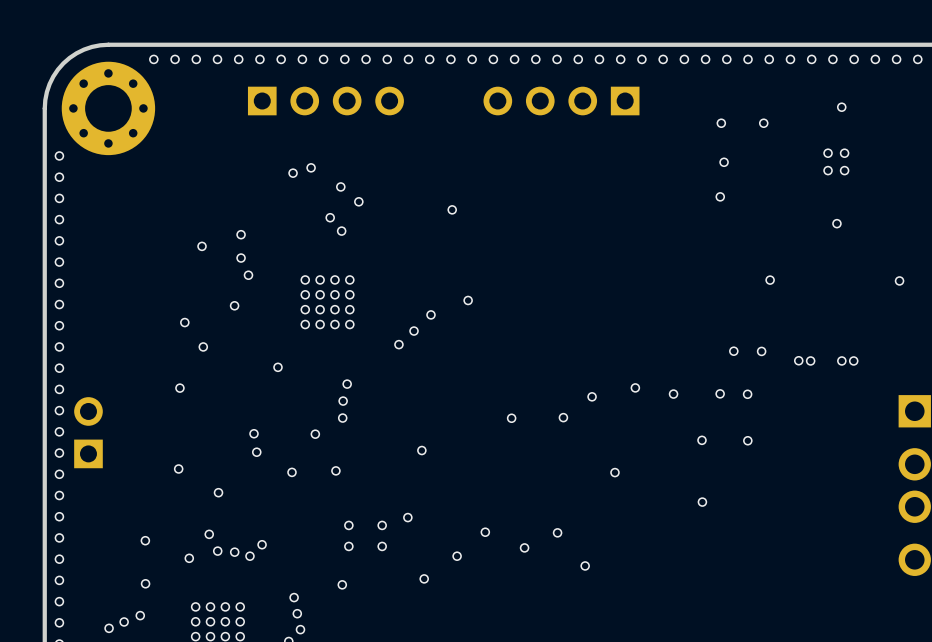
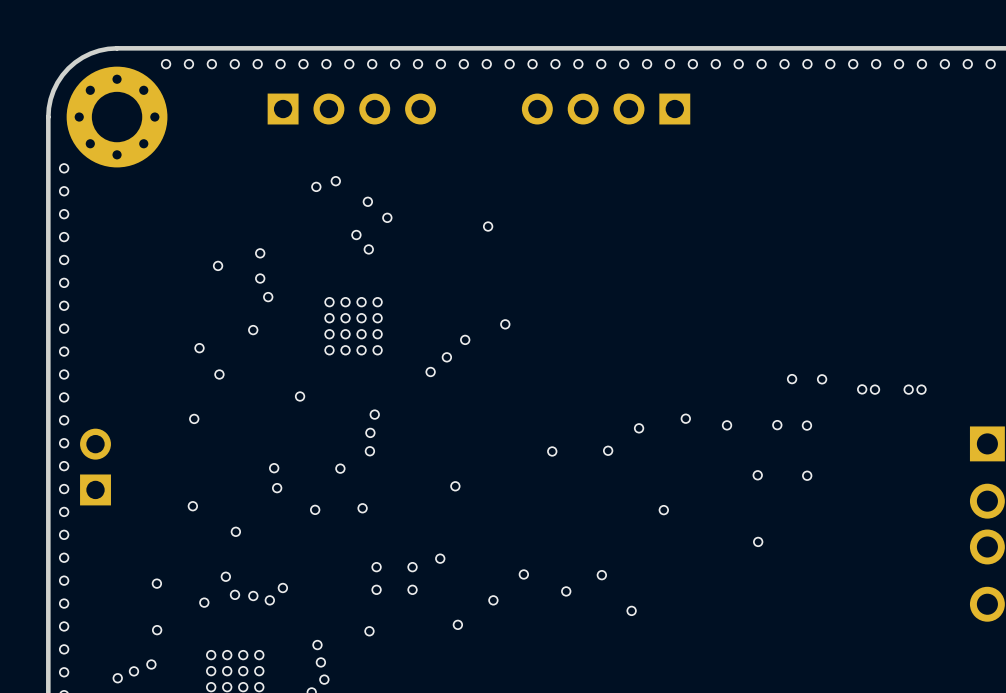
via: (841, 107) -> none
via: (721, 123) -> none
via: (763, 123) -> none
via: (828, 153) -> none
via: (844, 153) -> none
via: (724, 162) -> none
via: (828, 170) -> none
via: (844, 170) -> none
via: (720, 196) -> none
via: (836, 223) -> none
via: (770, 280) -> none
via: (899, 280) -> none

